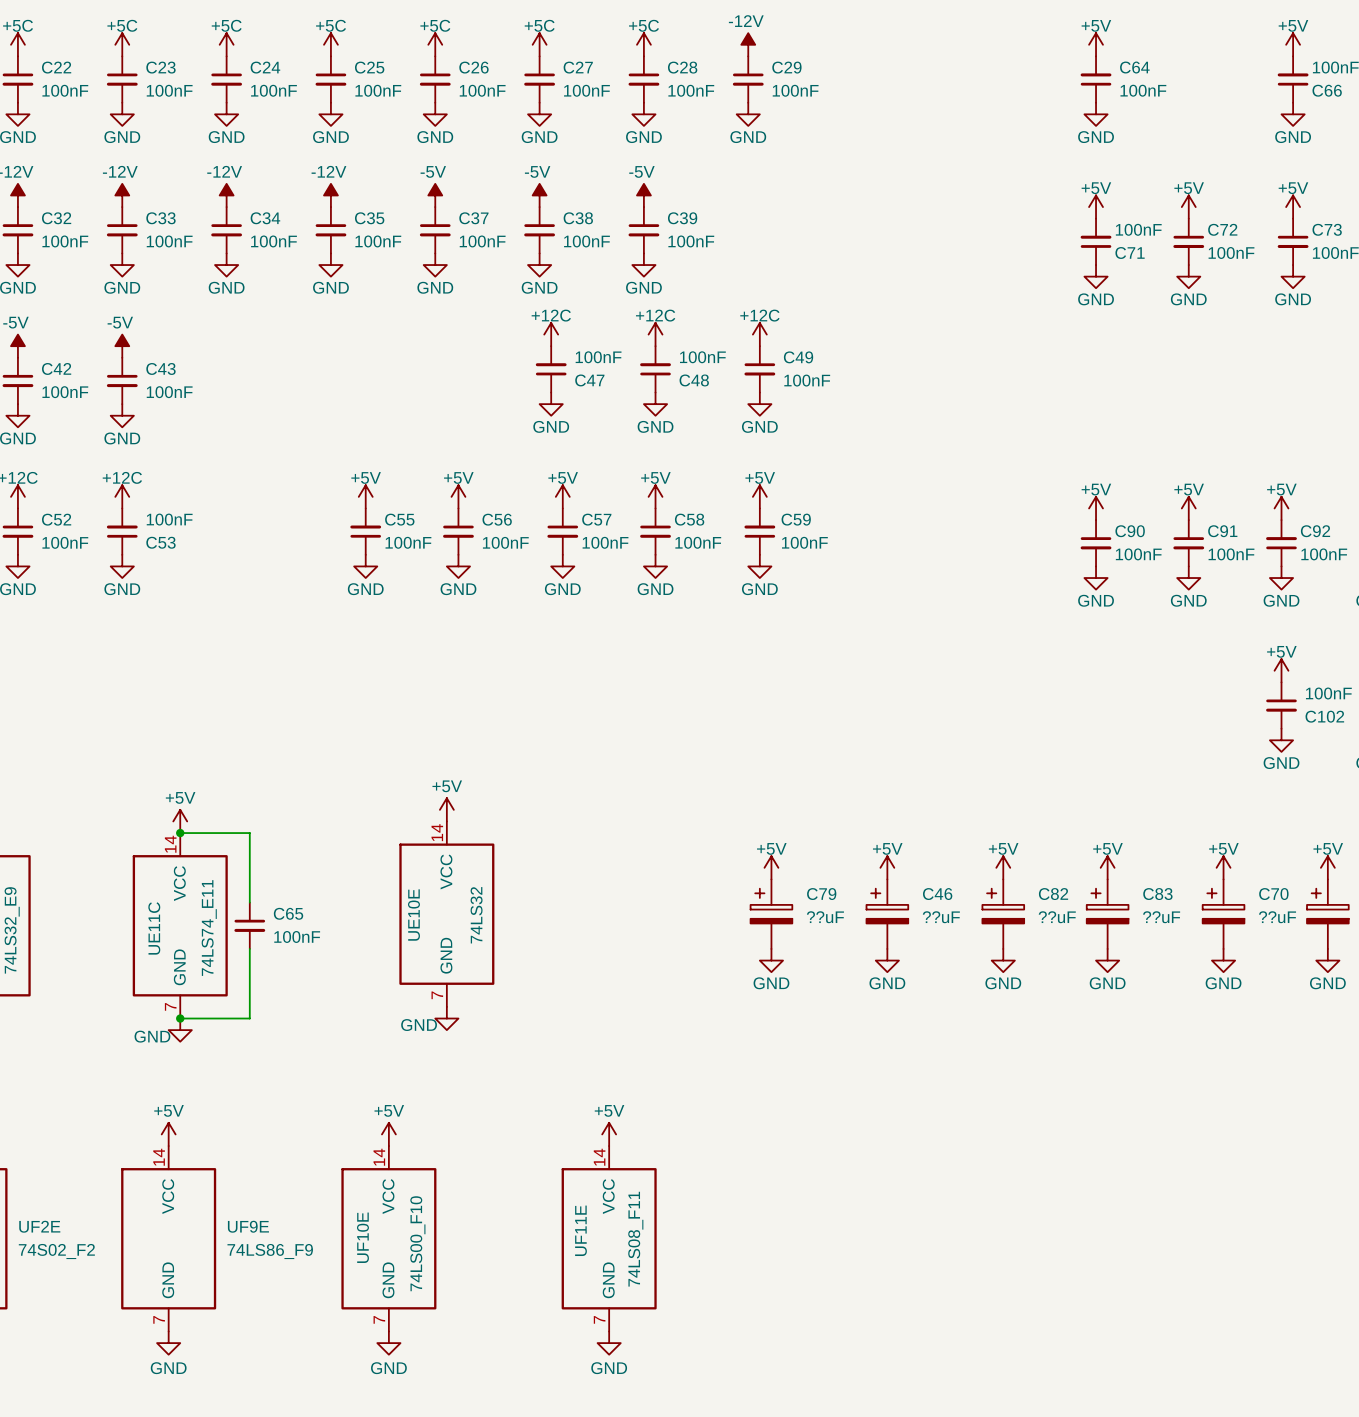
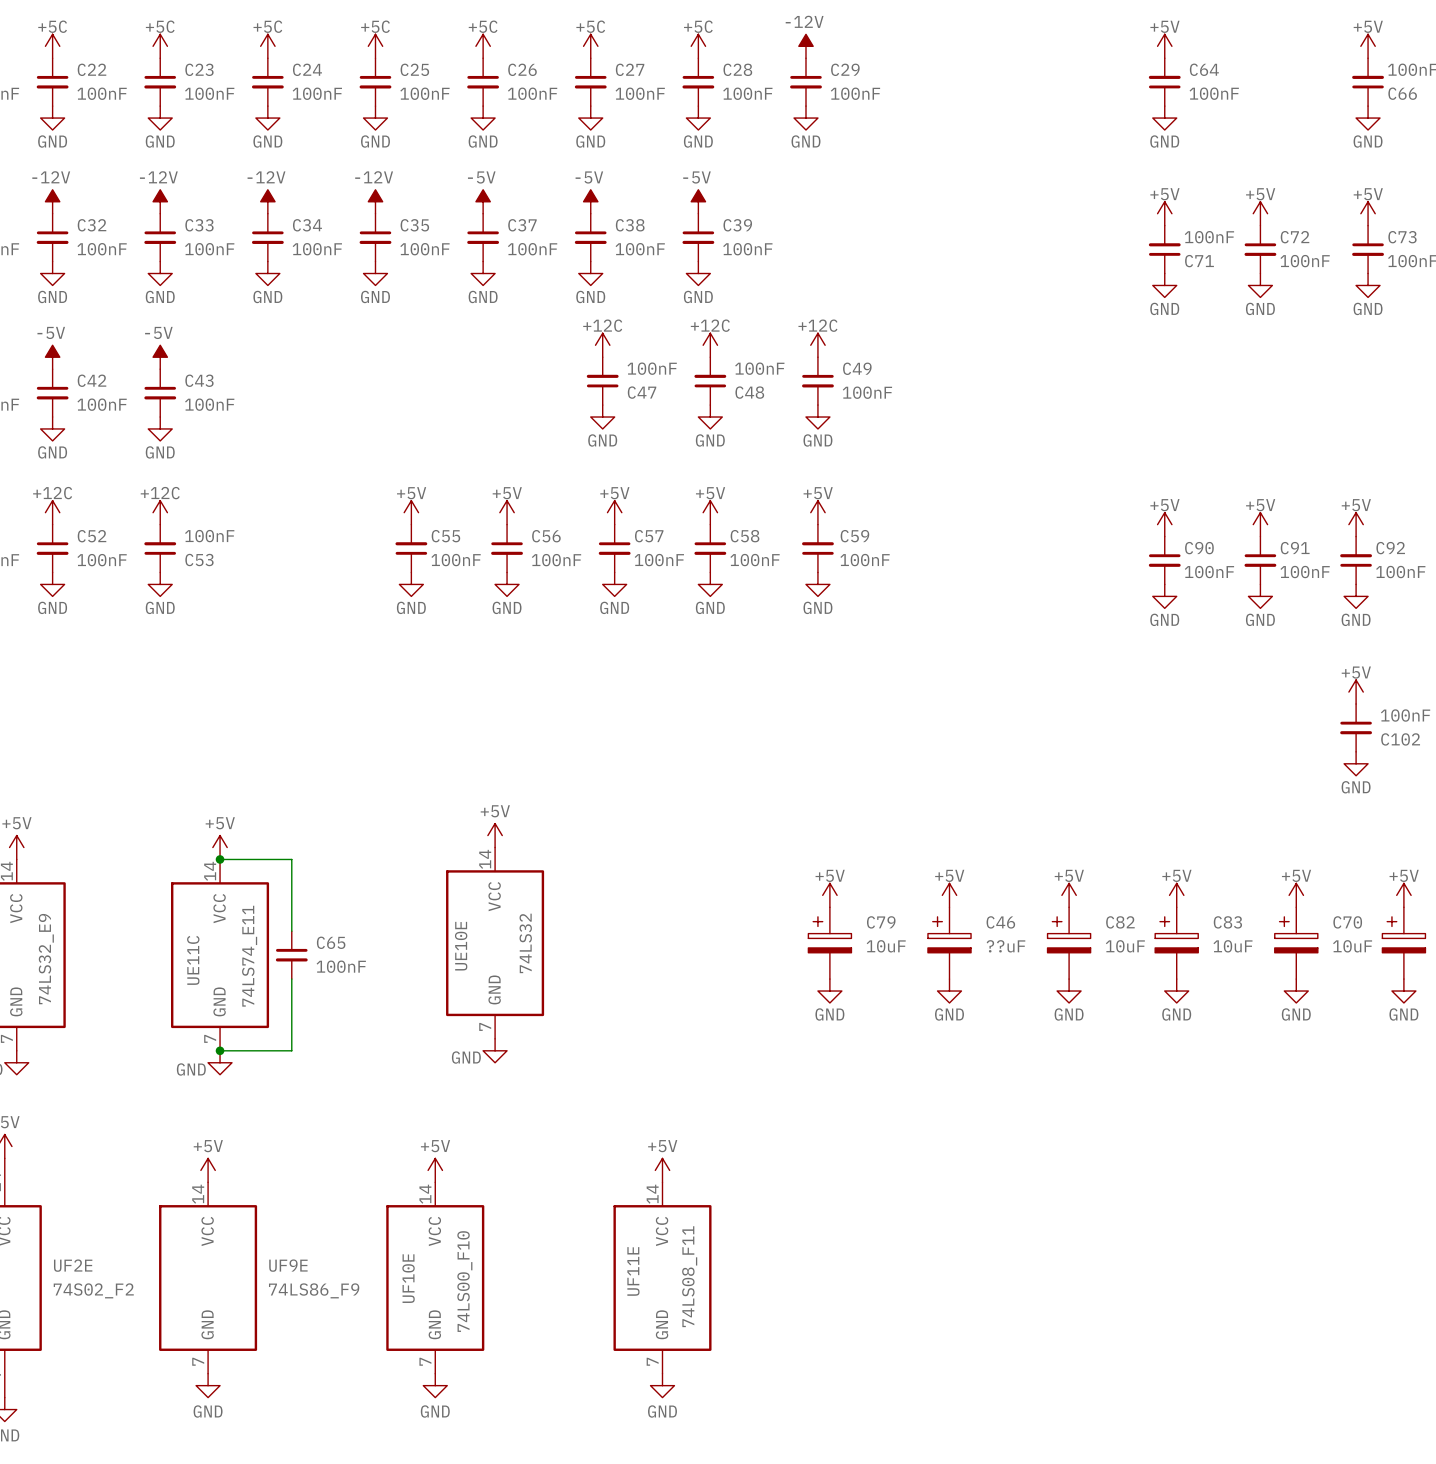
C79 value: ??uF (825, 917) -> 10uF (886, 946)
C82 value: ??uF (1057, 917) -> 10uF (1125, 946)
C83 value: ??uF (1161, 917) -> 10uF (1232, 946)
C70 value: ??uF (1277, 917) -> 10uF (1352, 946)

